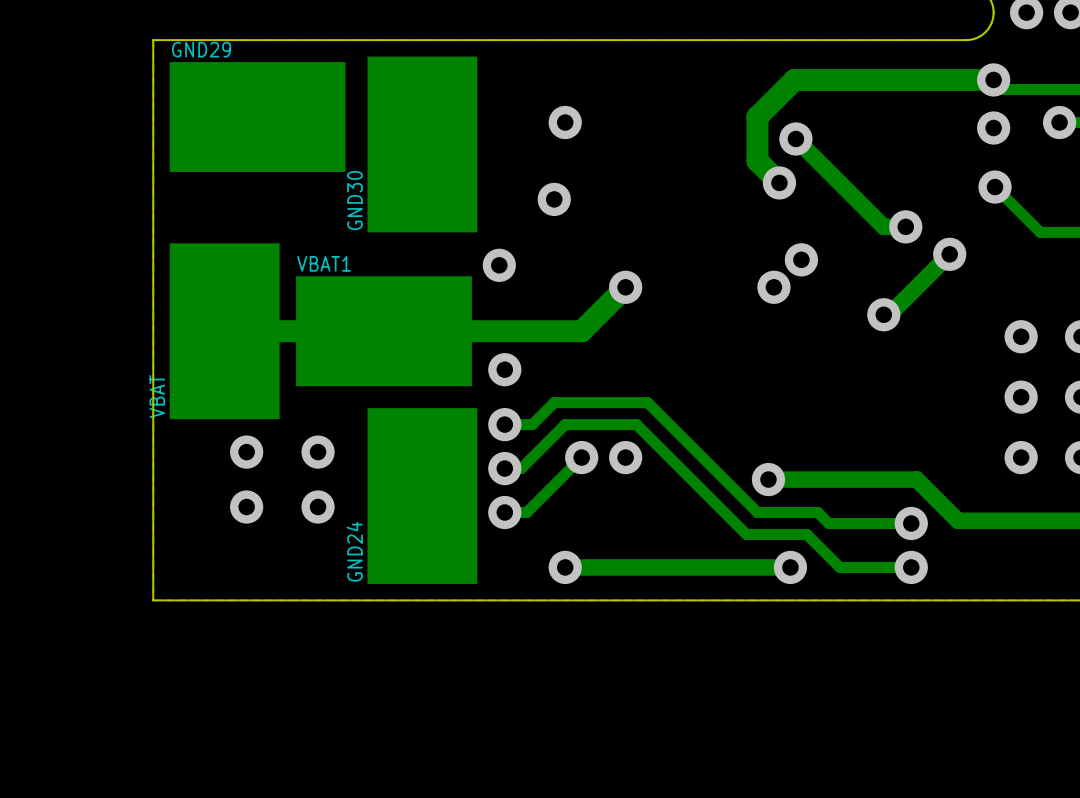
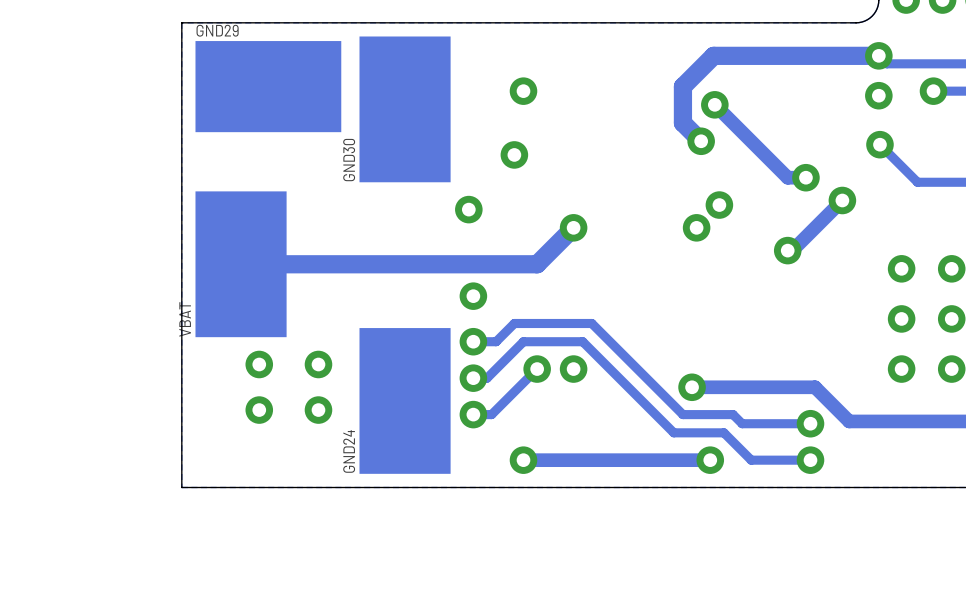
VBAT1: (383, 331) -> none

